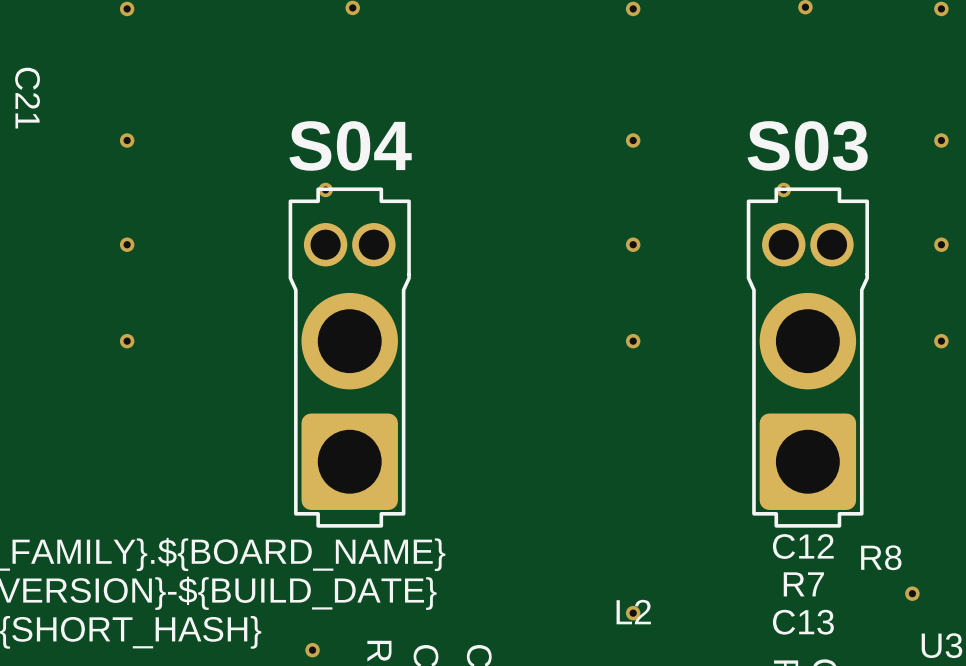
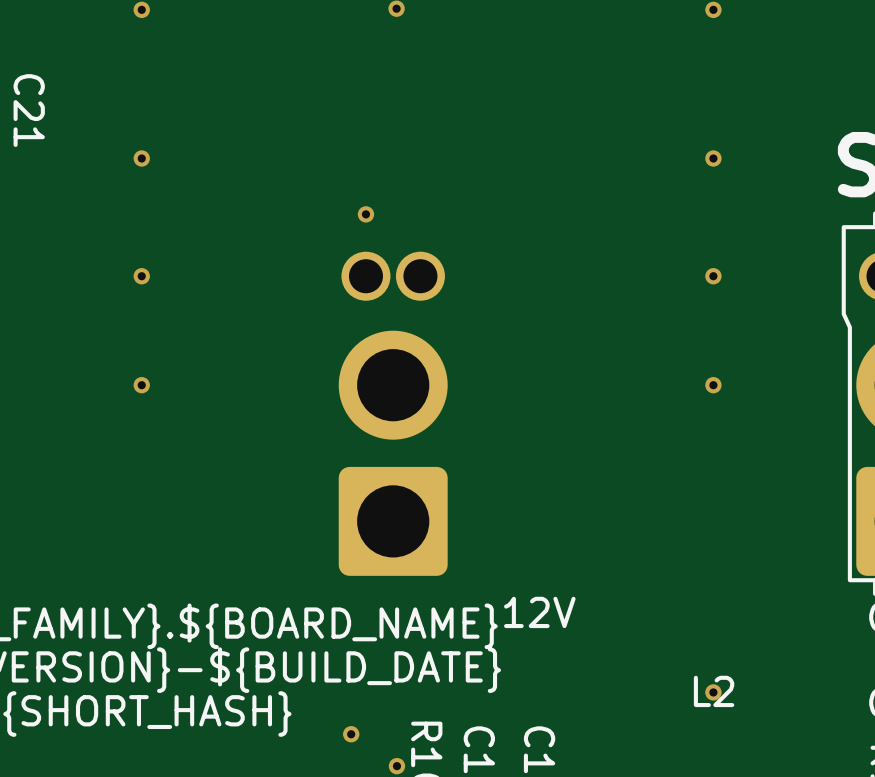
text: S04 (350, 145) -> none
part side: bottom (349, 357) -> top (393, 413)
text: none -> 12V (539, 612)

